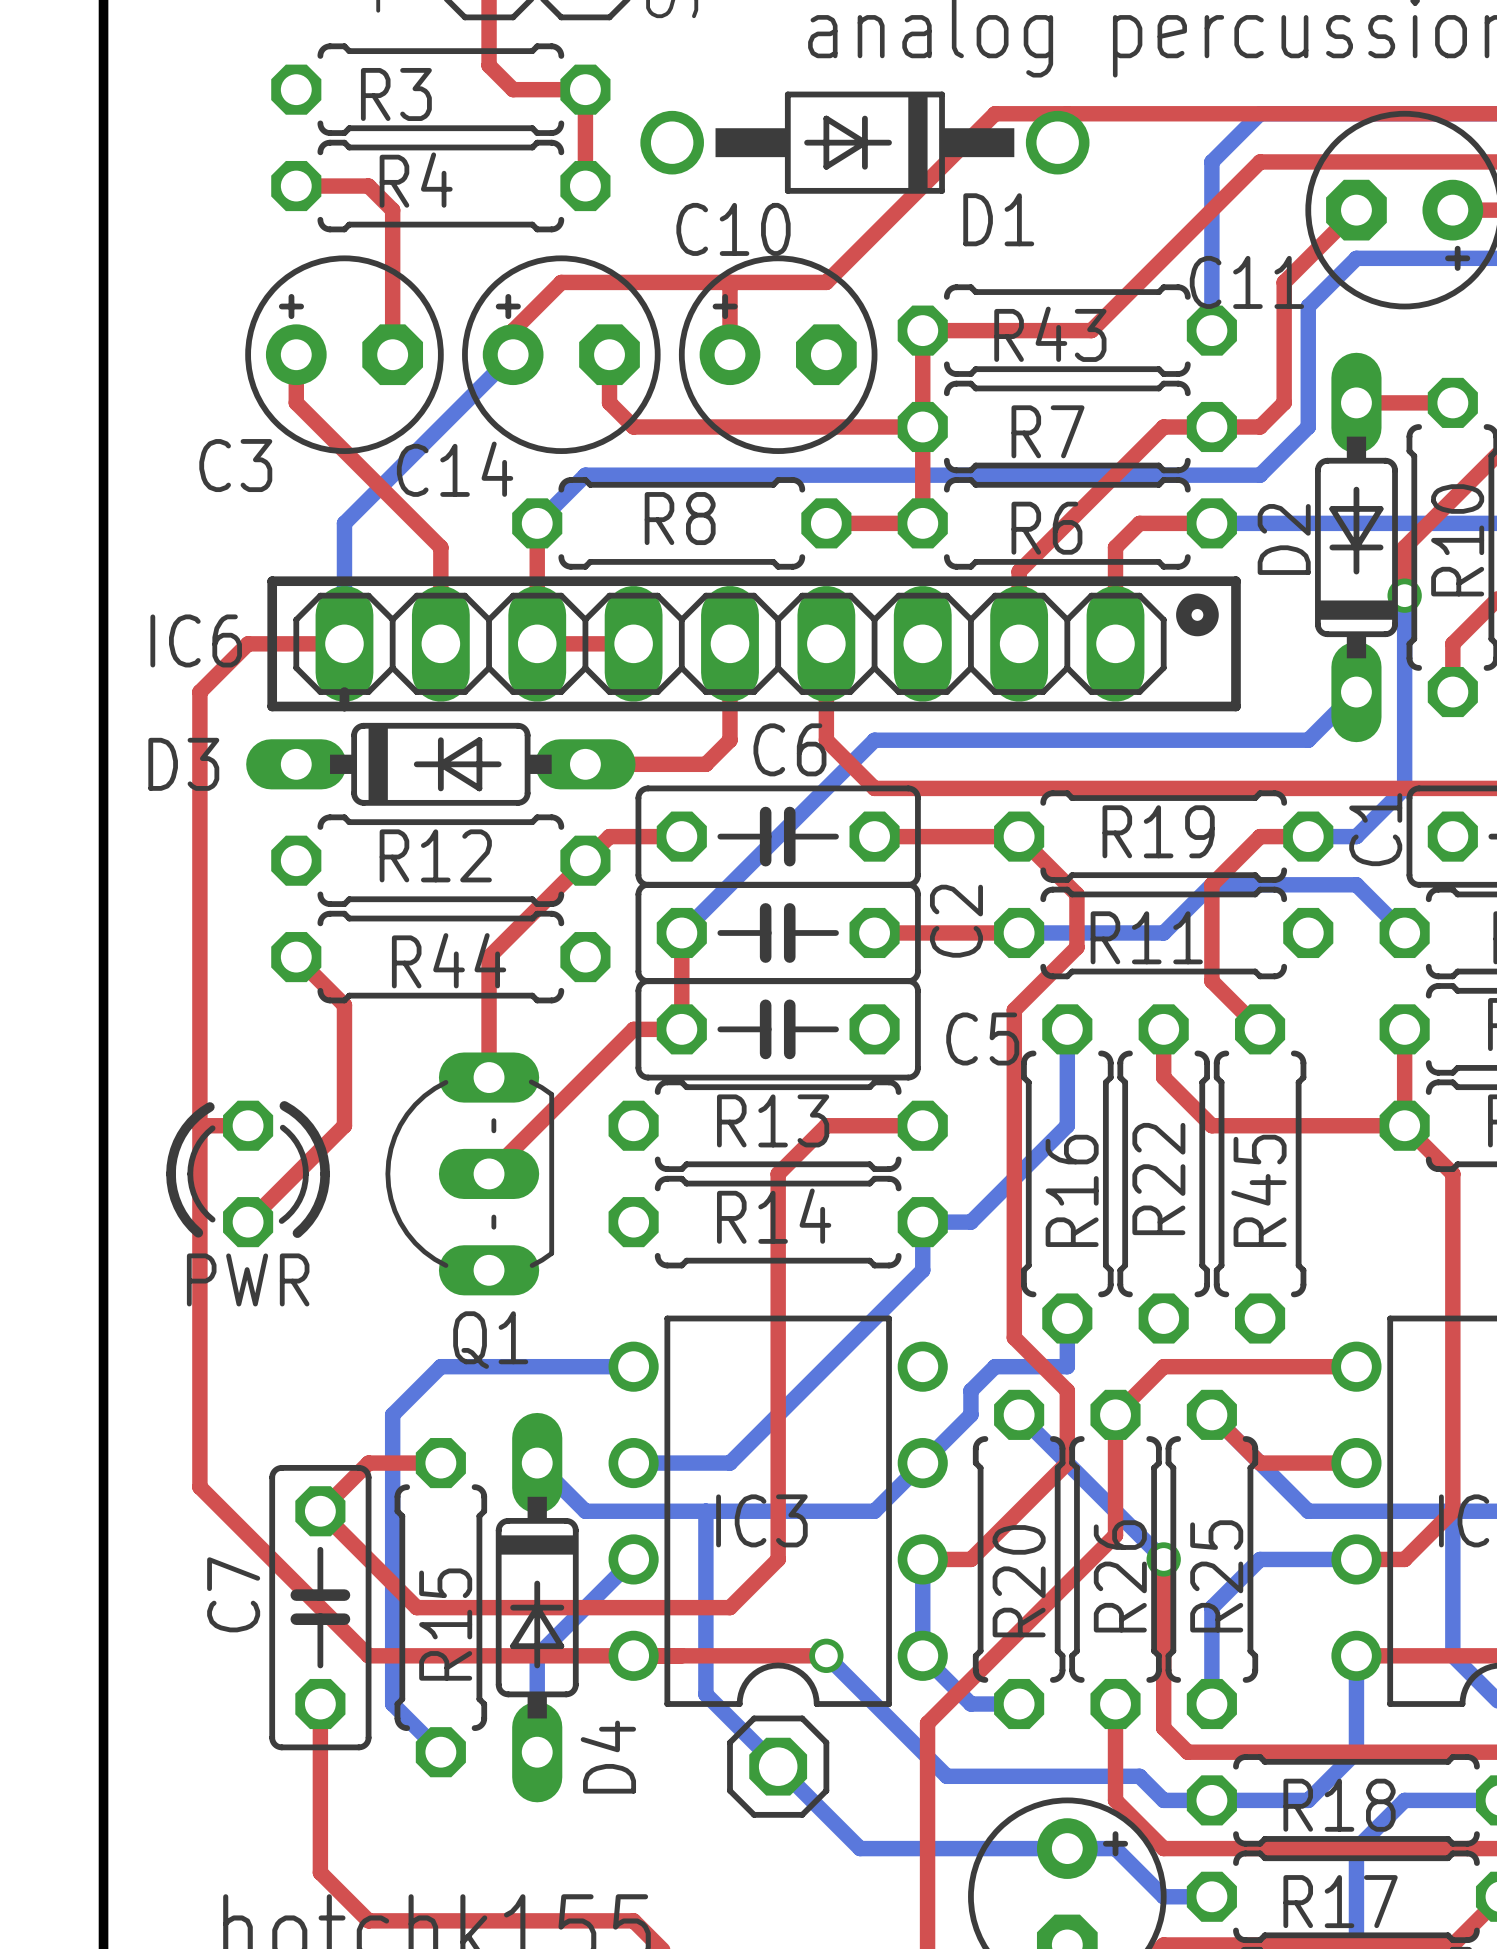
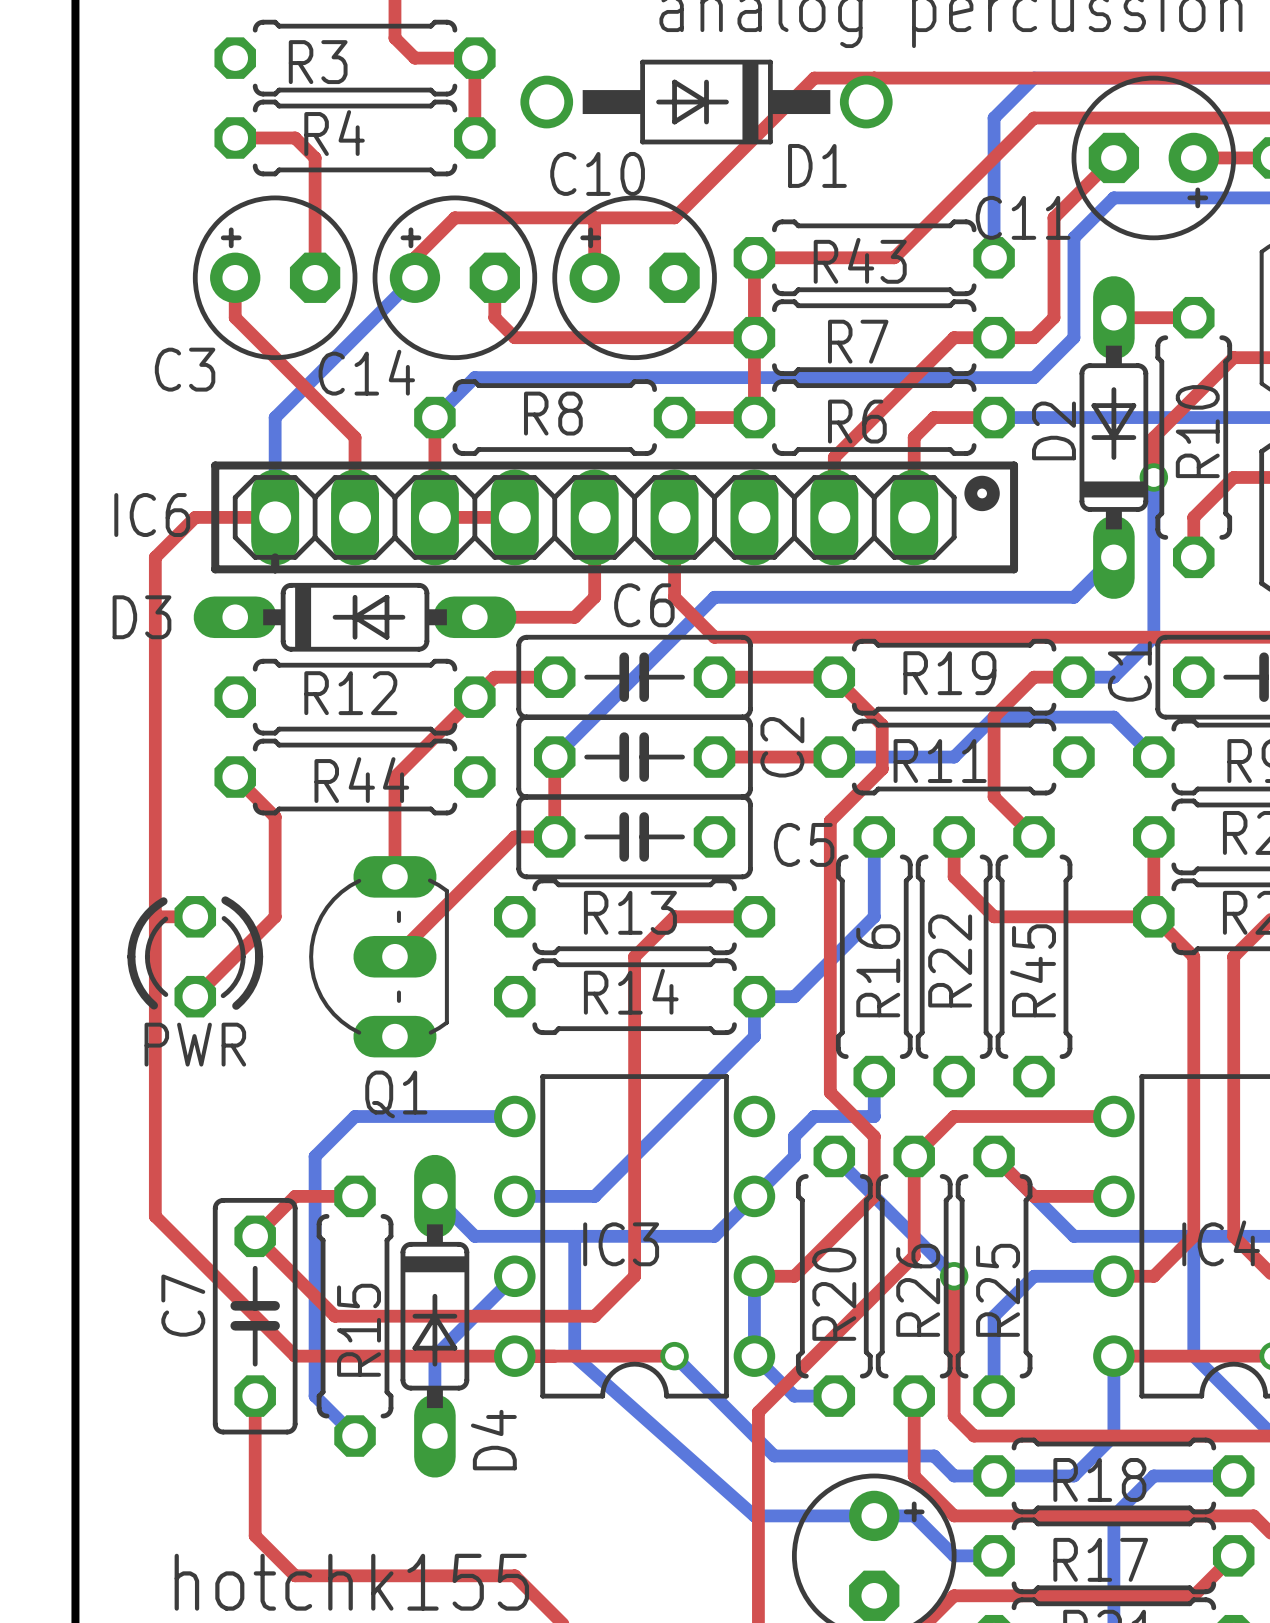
bottom track: (705, 1655) (705, 1694) (860, 1848) (922, 1848) -> (574, 1356) (754, 1515)
part: (778, 1766) -> none

